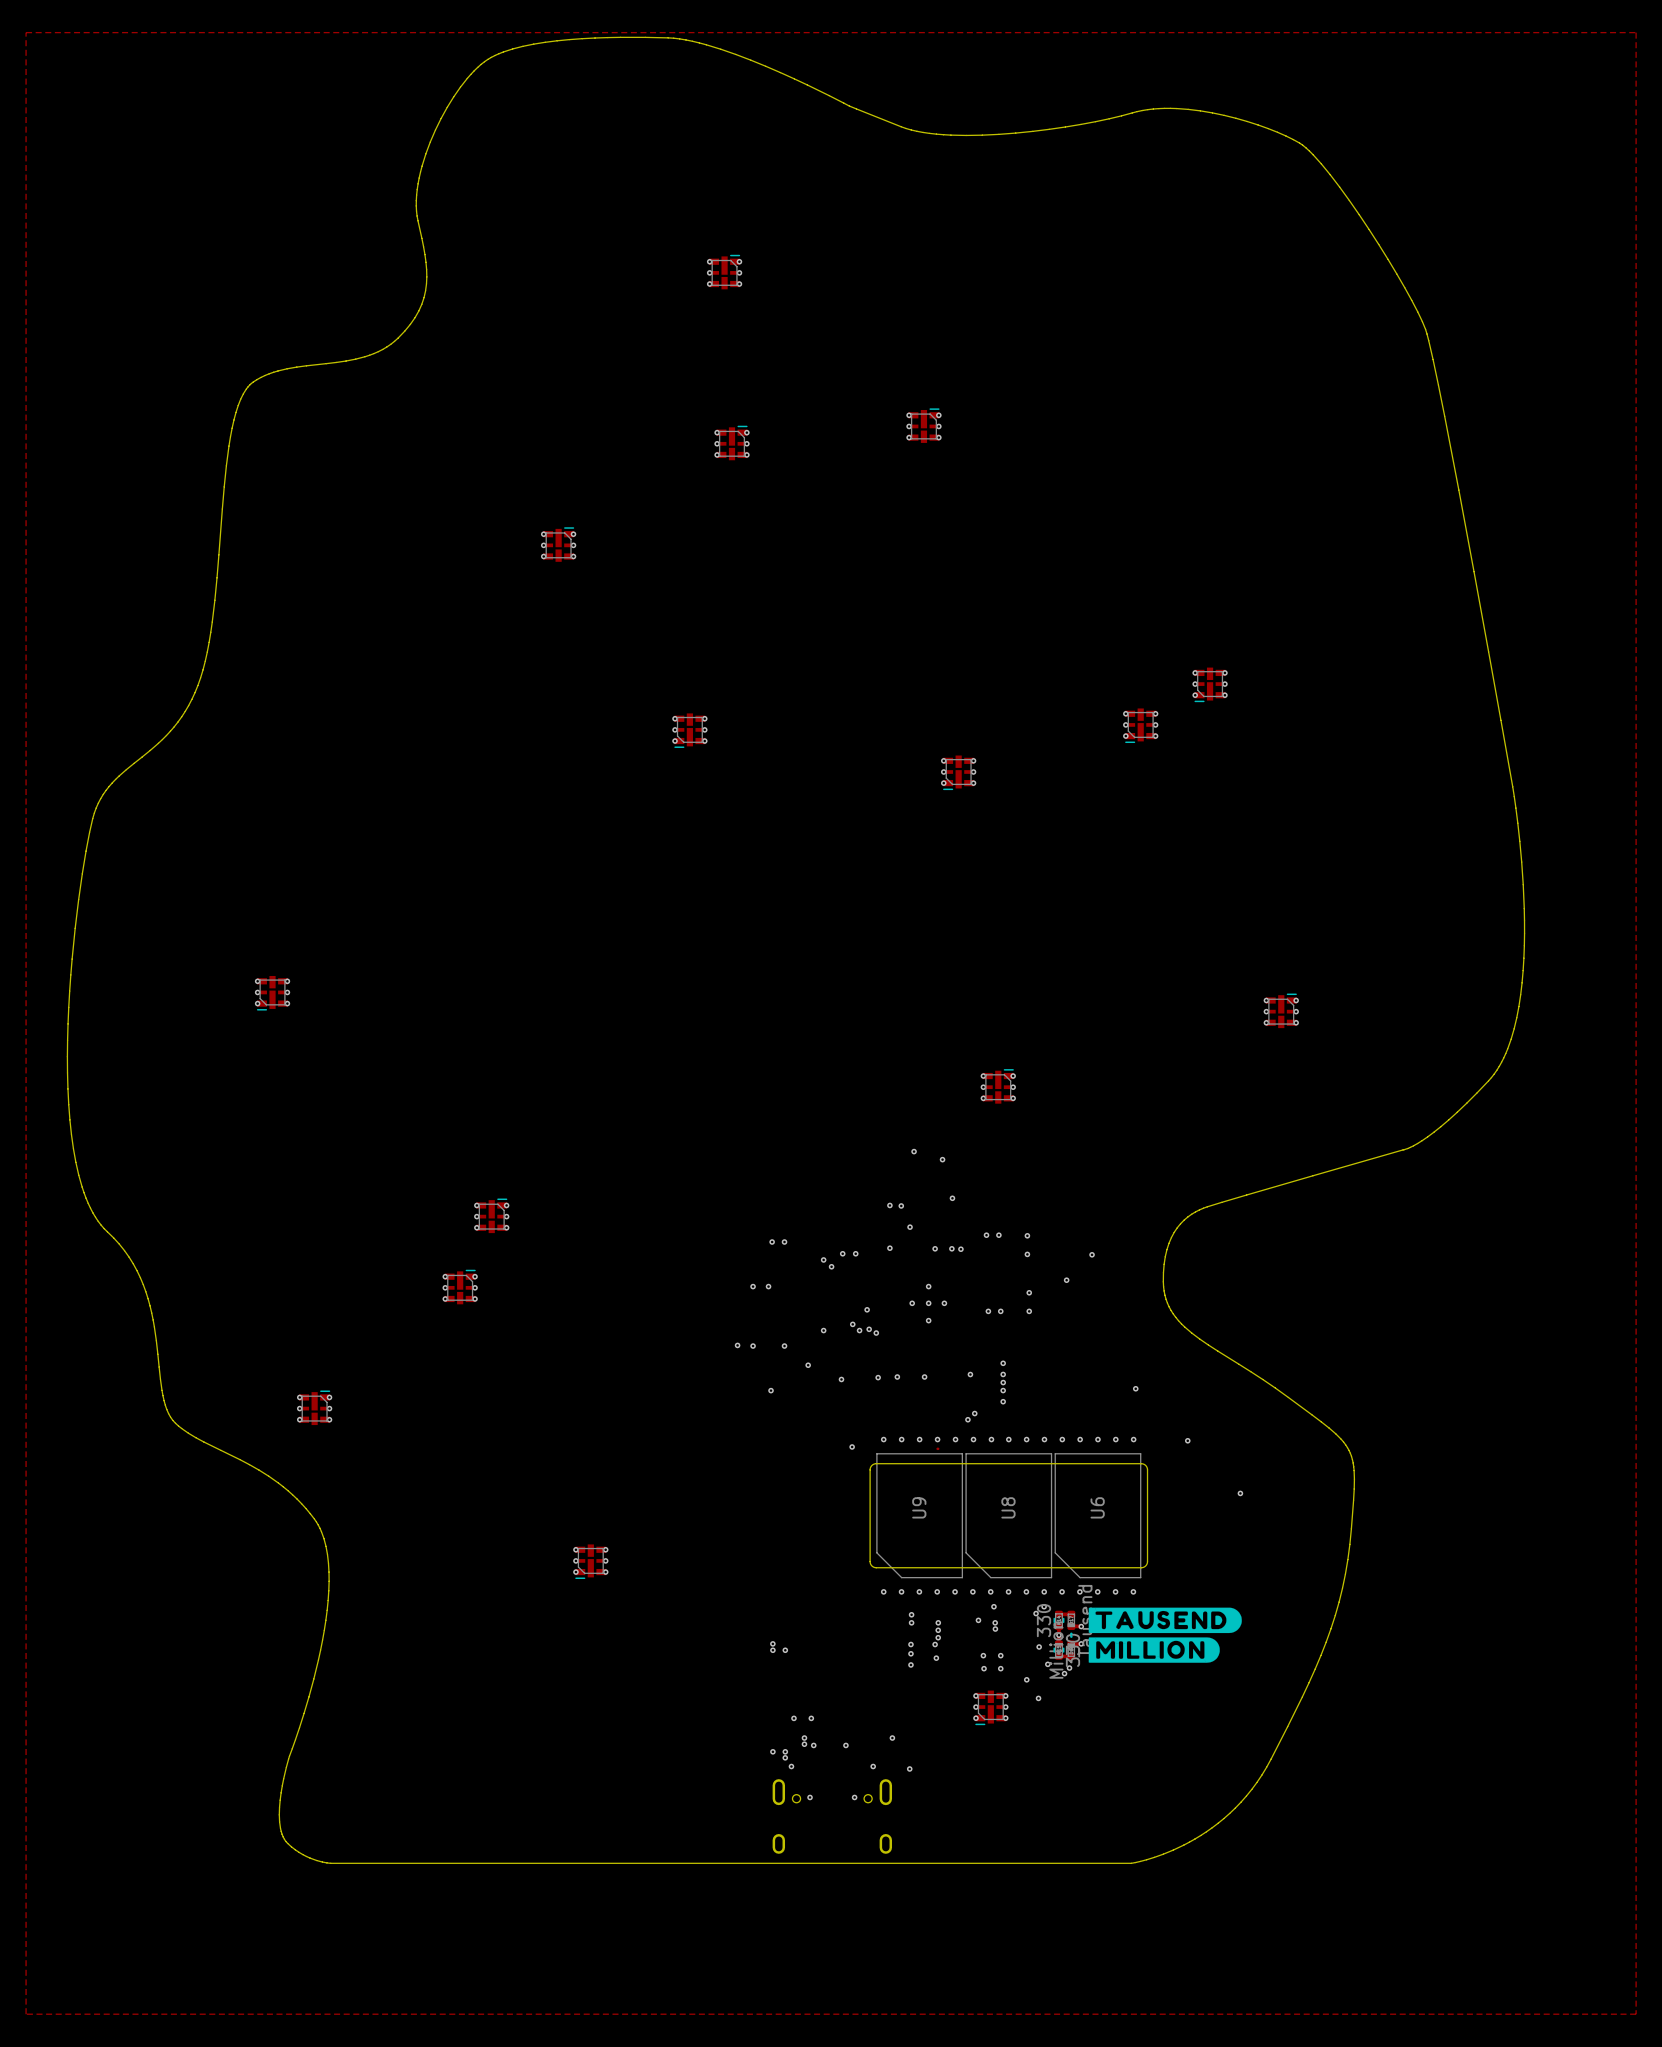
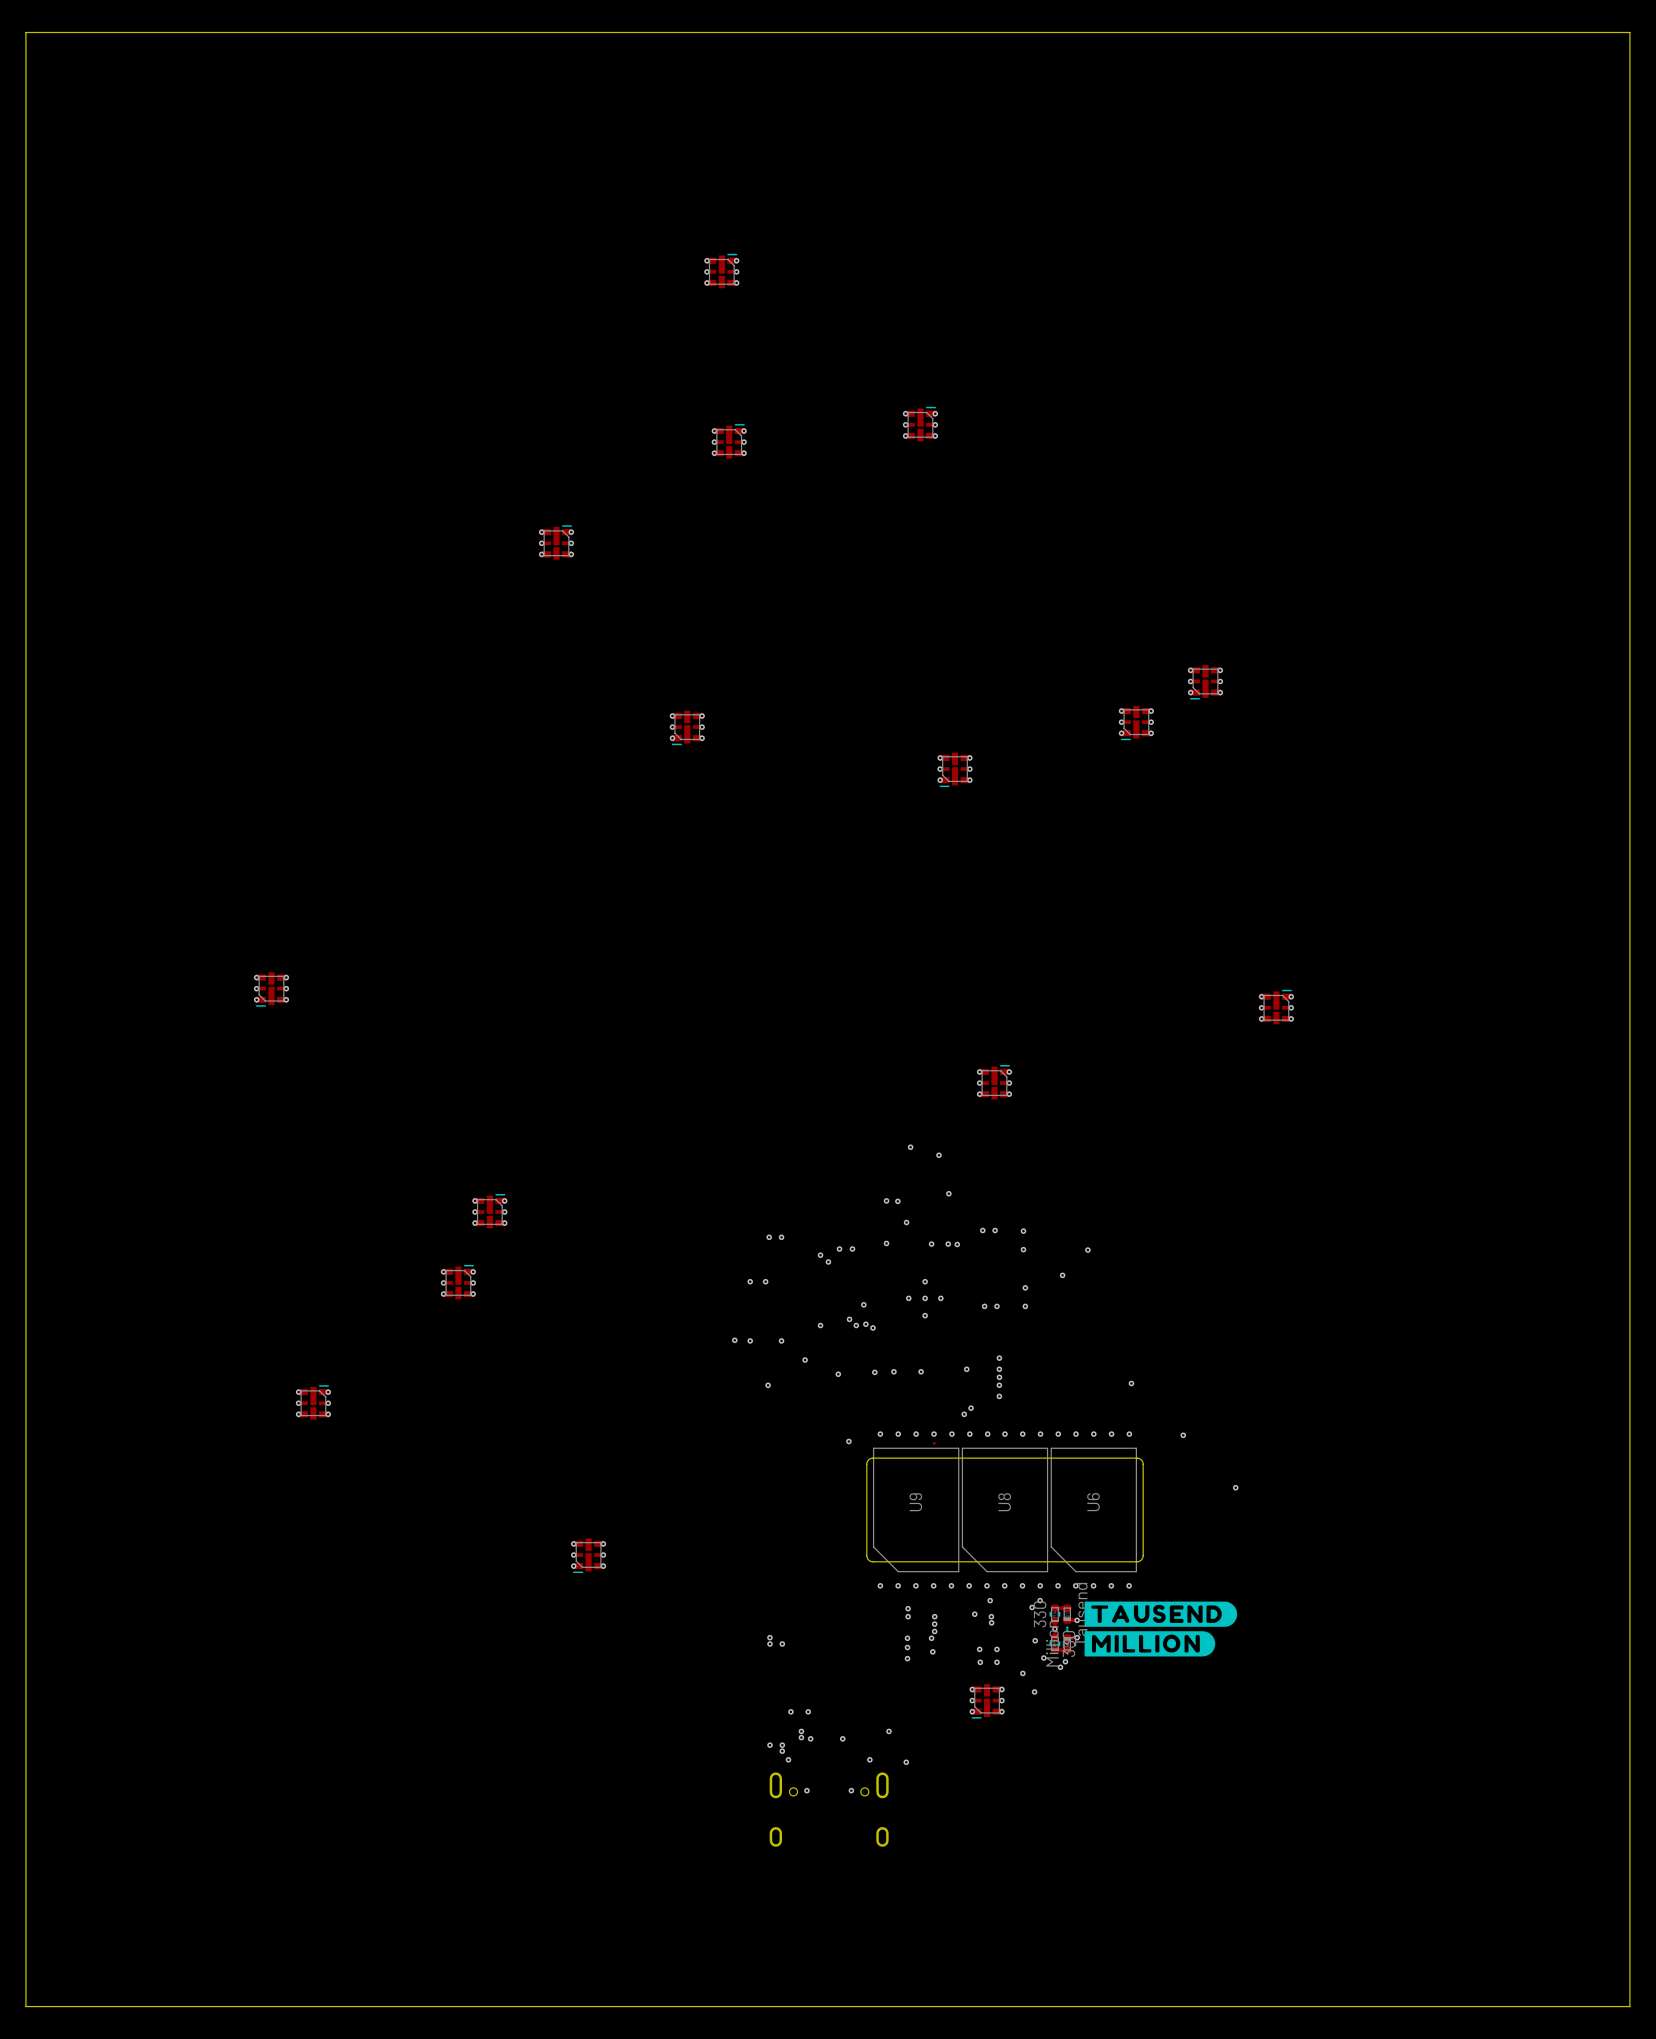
board edge: none -> (25, 32) (1629, 32) (1629, 2006) (25, 2006) (25, 32)
zone outline: (26, 32) (1636, 32) (1636, 2014) (26, 2014) (26, 32) -> none
drawing: [66, 36, 1526, 1864] -> none

